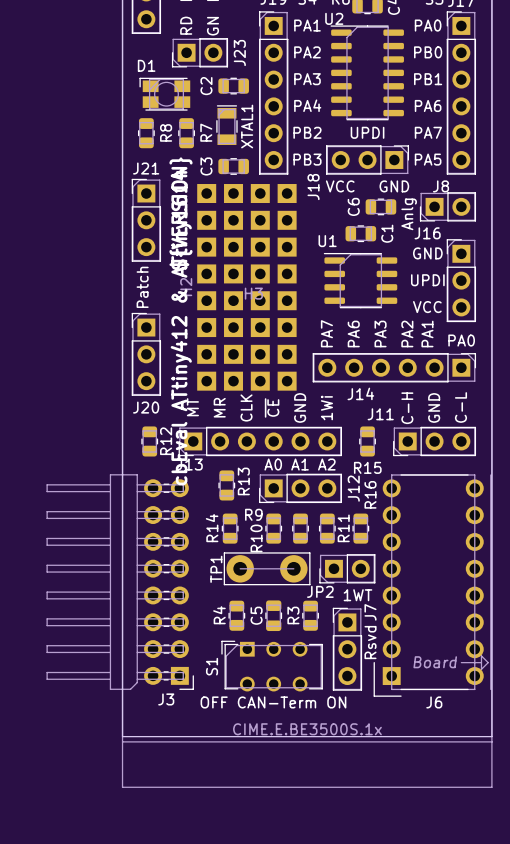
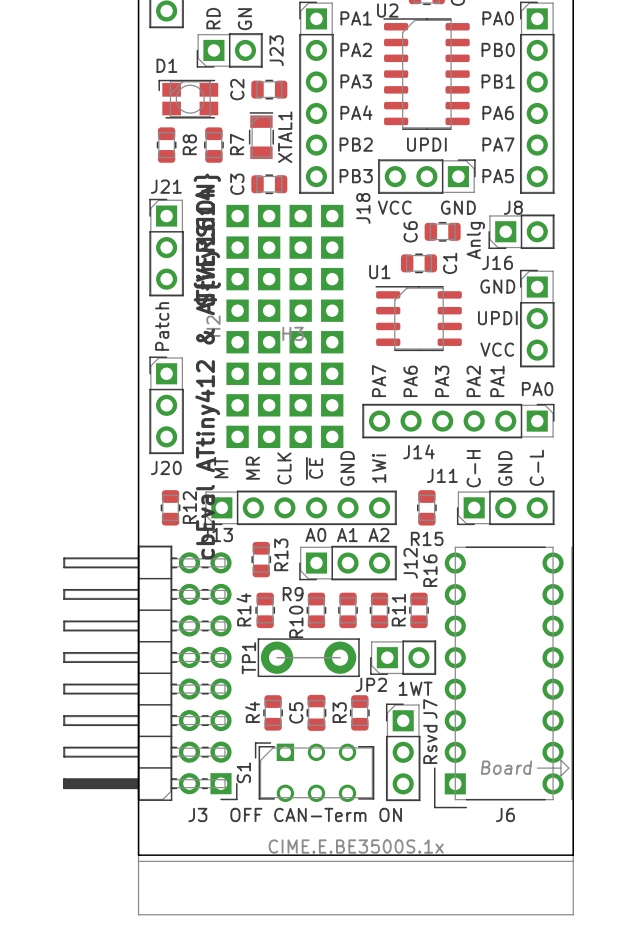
J3 footprint: [46, 474, 194, 690] -> [63, 545, 238, 801]

